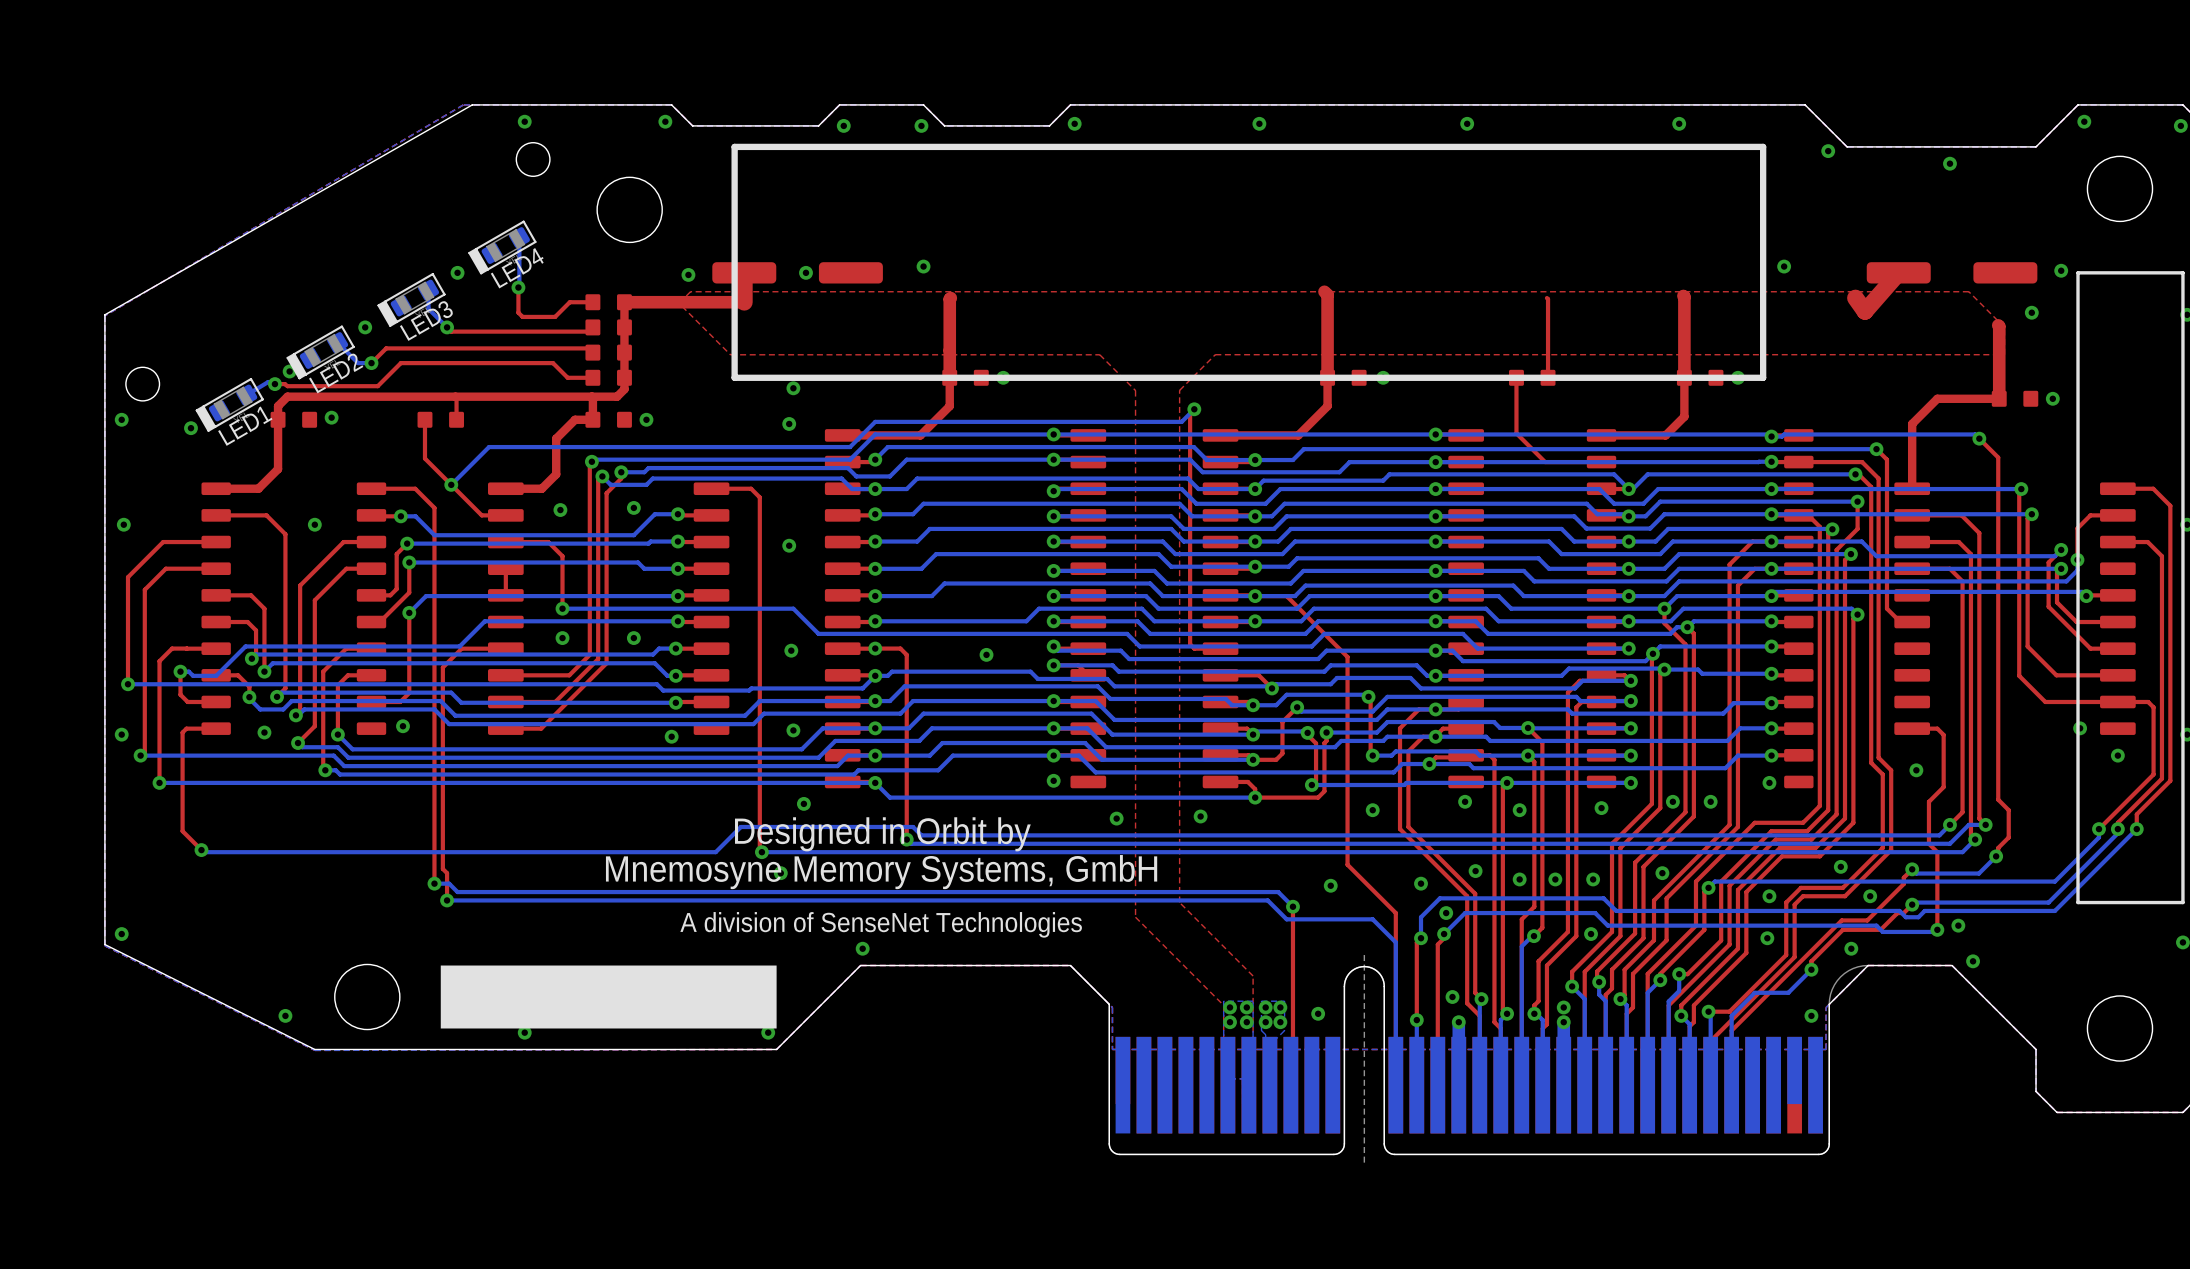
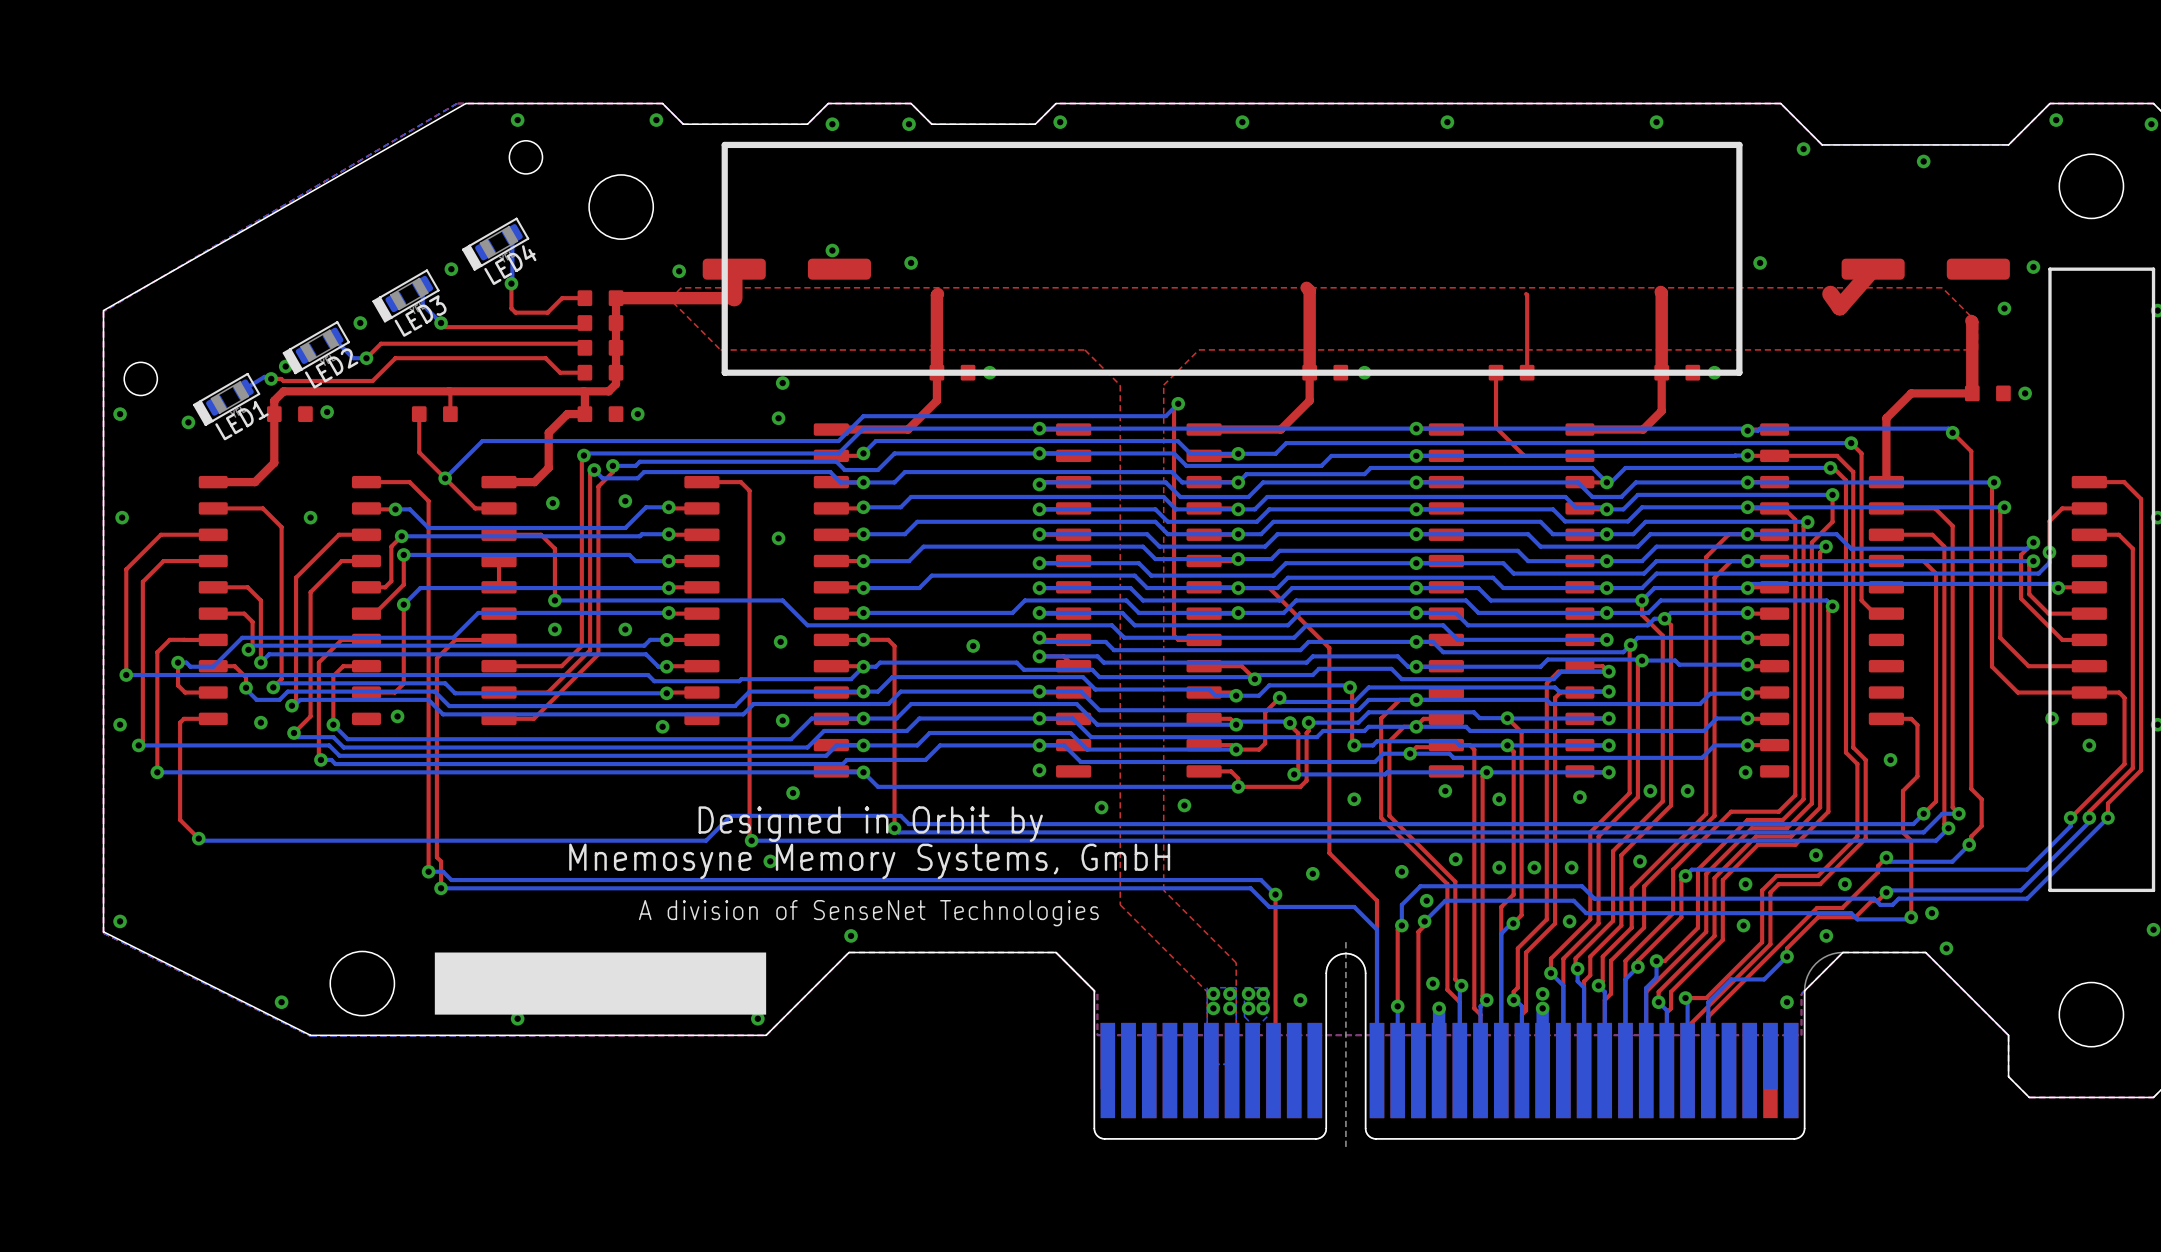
via position: (806, 272) -> (832, 250)

